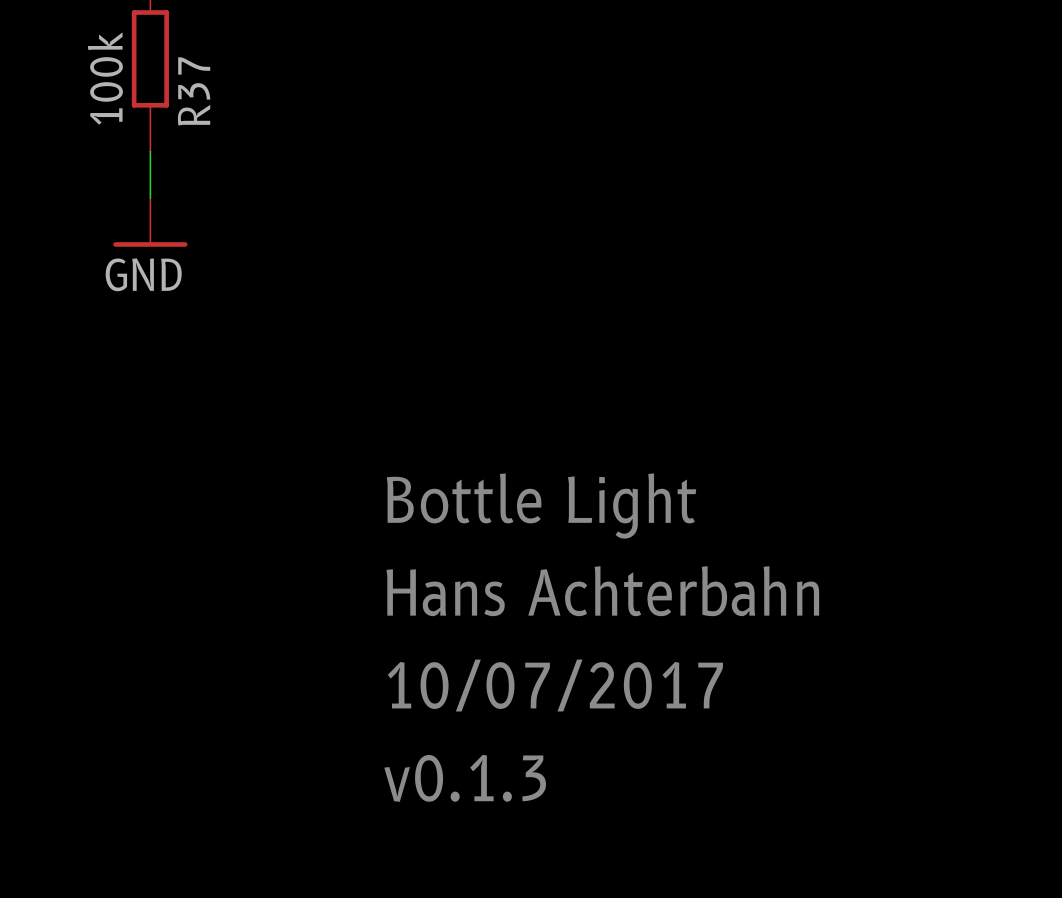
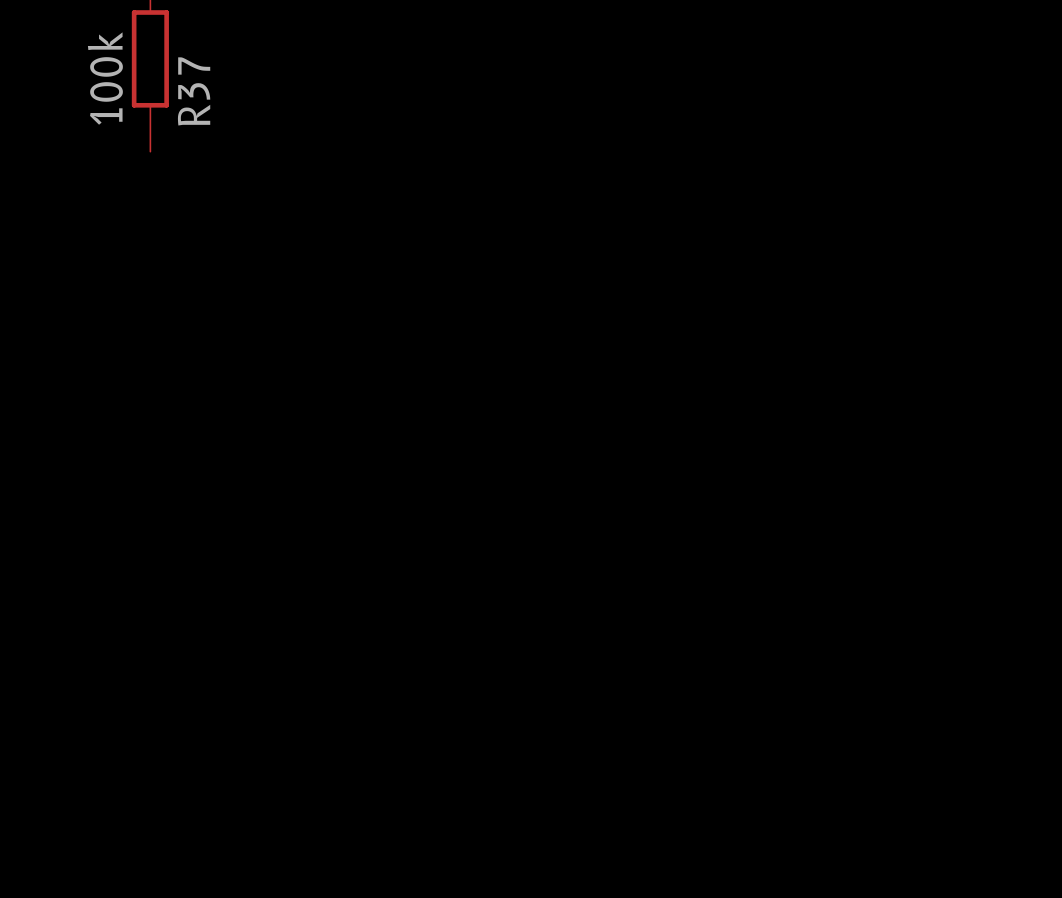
wire: (150, 151) (150, 198) -> none
power symbol: GND (150, 222) -> none
text: Bottle Light (541, 506) -> none
text: Hans Achterbahn (602, 591) -> none
text: 10/07/2017 (555, 685) -> none
text: v0.1.3 (465, 778) -> none

